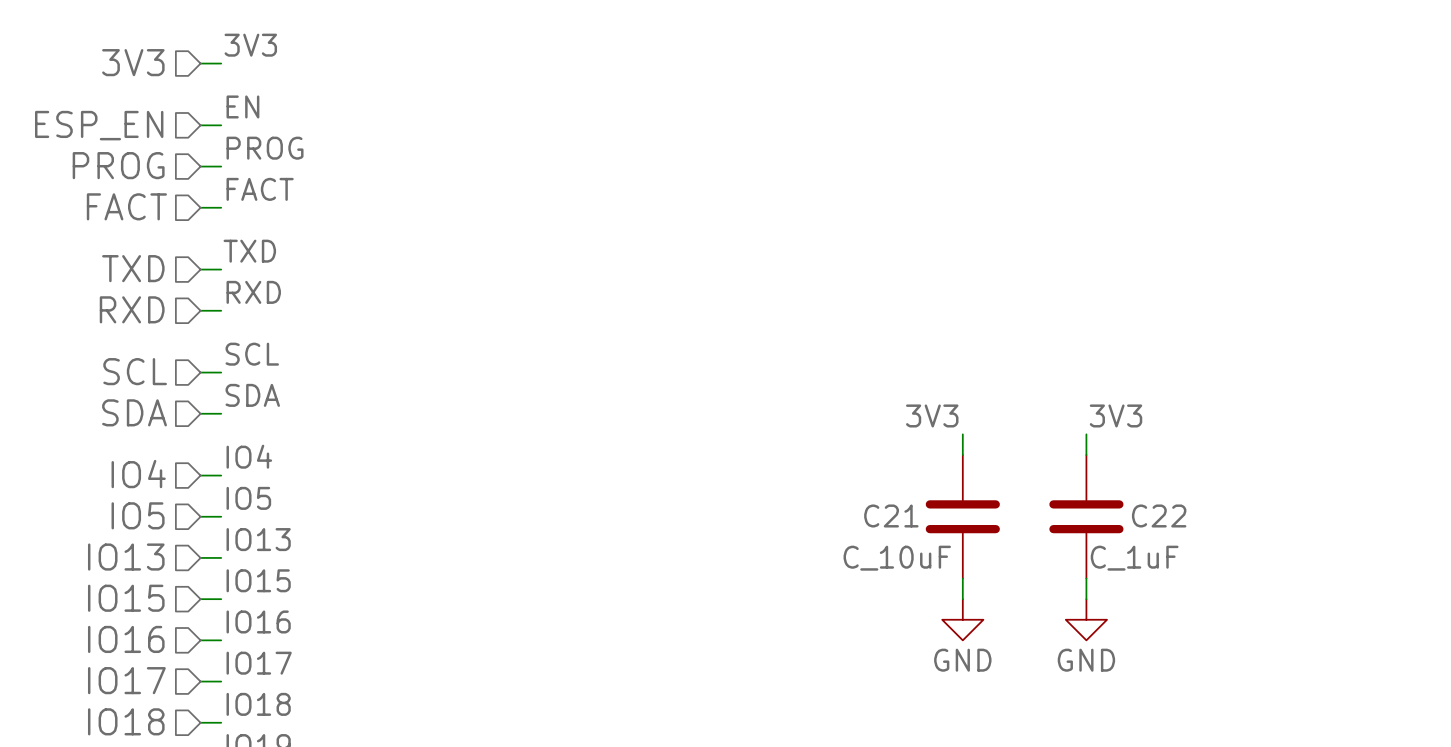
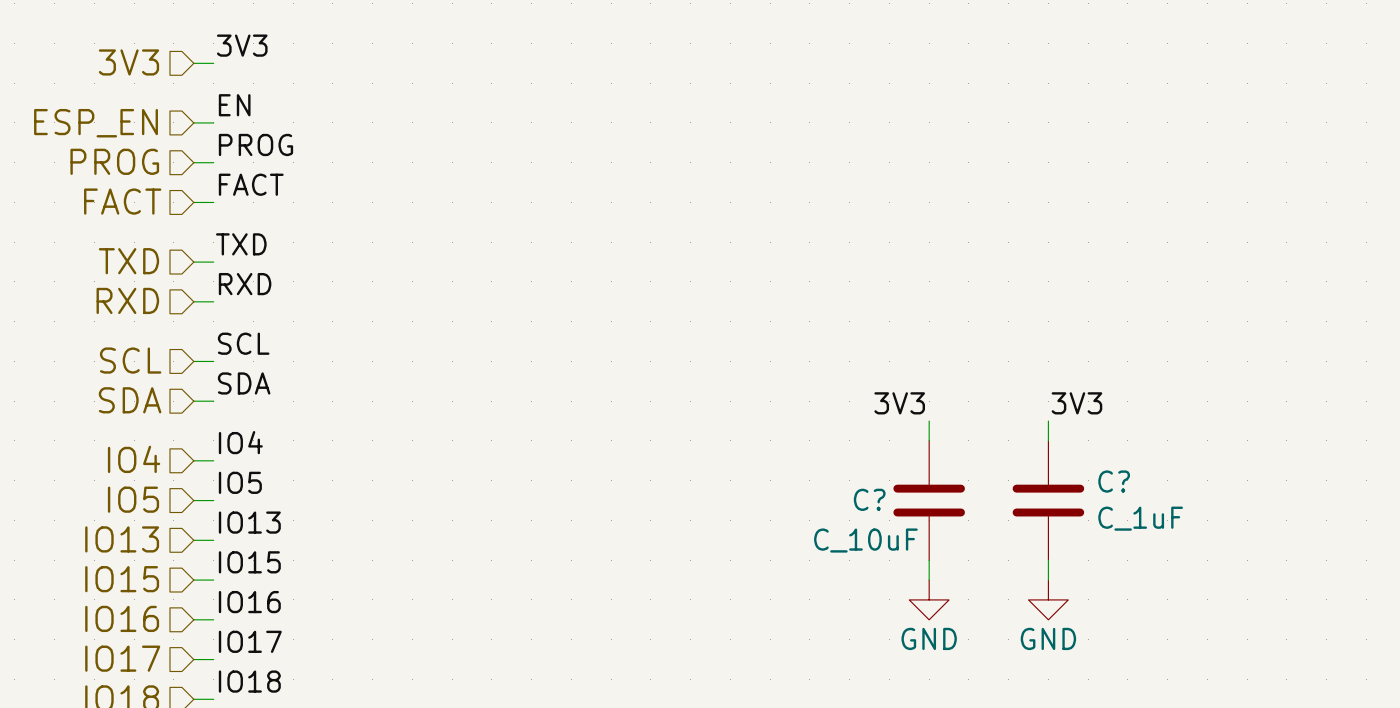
C21 name: C21 (891, 515) -> C? (869, 499)
C22 name: C22 (1159, 515) -> C? (1114, 481)
C22 value position: C_1uF (1134, 558) -> C_1uF (1140, 518)

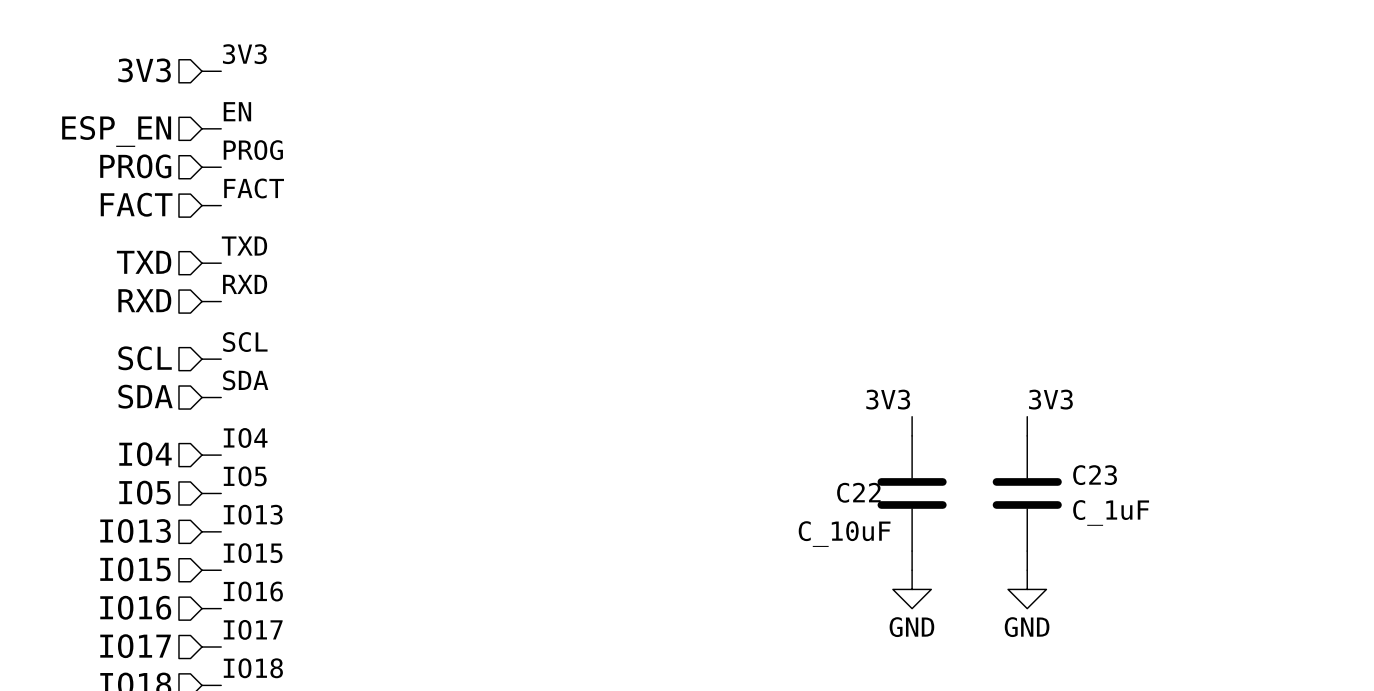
C? name: C? (1114, 481) -> C23 (1095, 475)
C? name: C? (869, 499) -> C22 (858, 492)

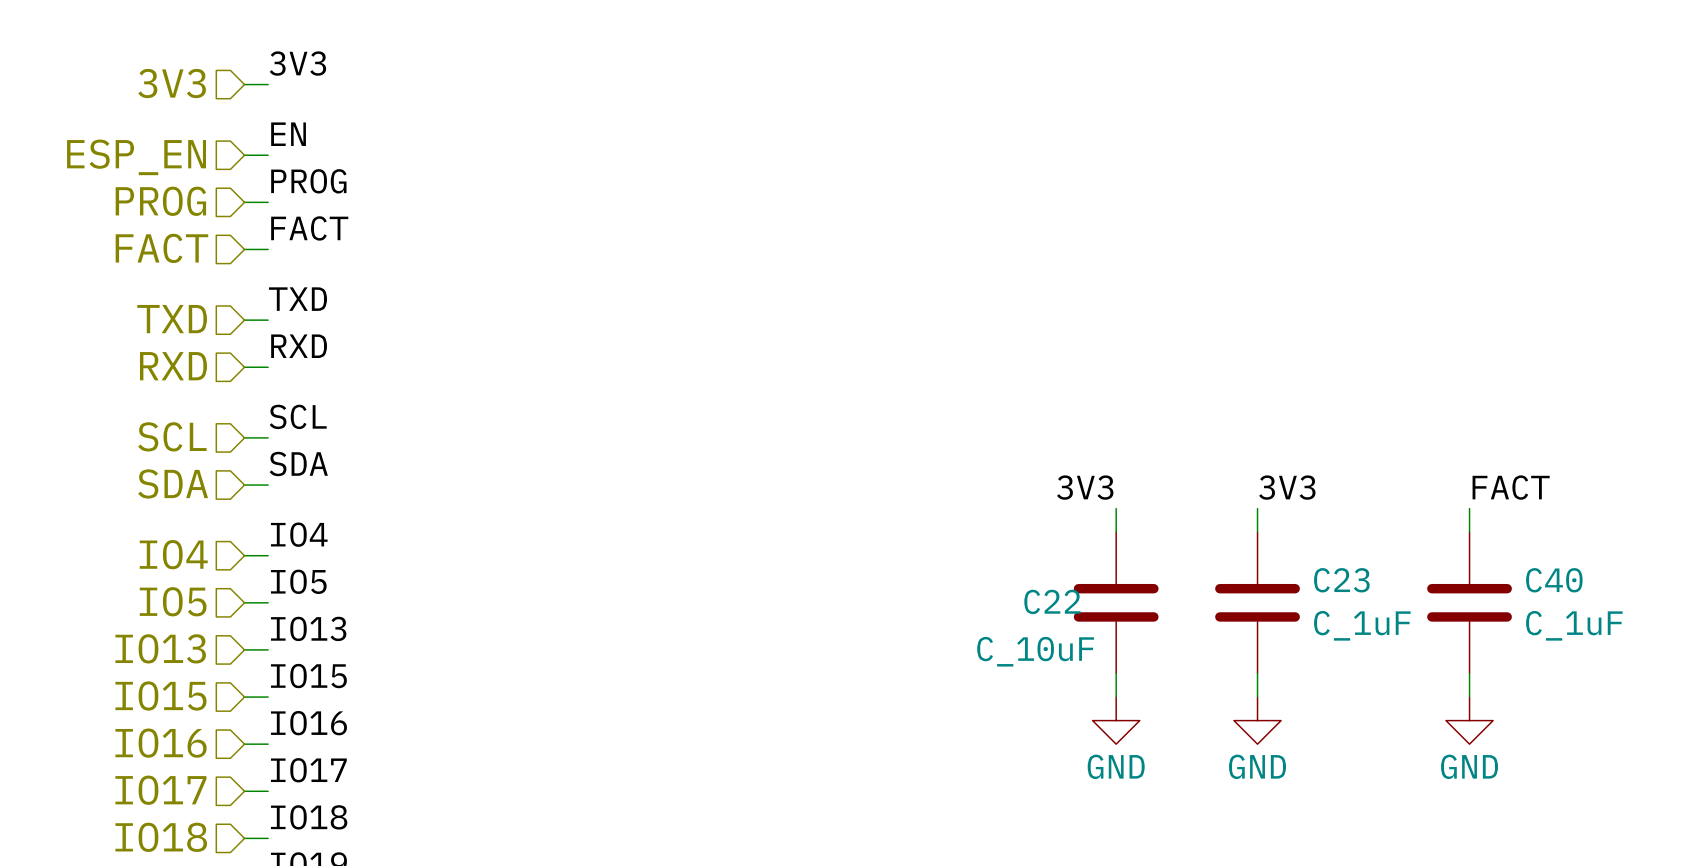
label: none -> FACT (1511, 487)
wire: none -> (1469, 508) (1469, 532)
C40: none -> C_1uF (1469, 602)
wire: none -> (1469, 673) (1469, 697)
power symbol: none -> GND (1469, 720)

